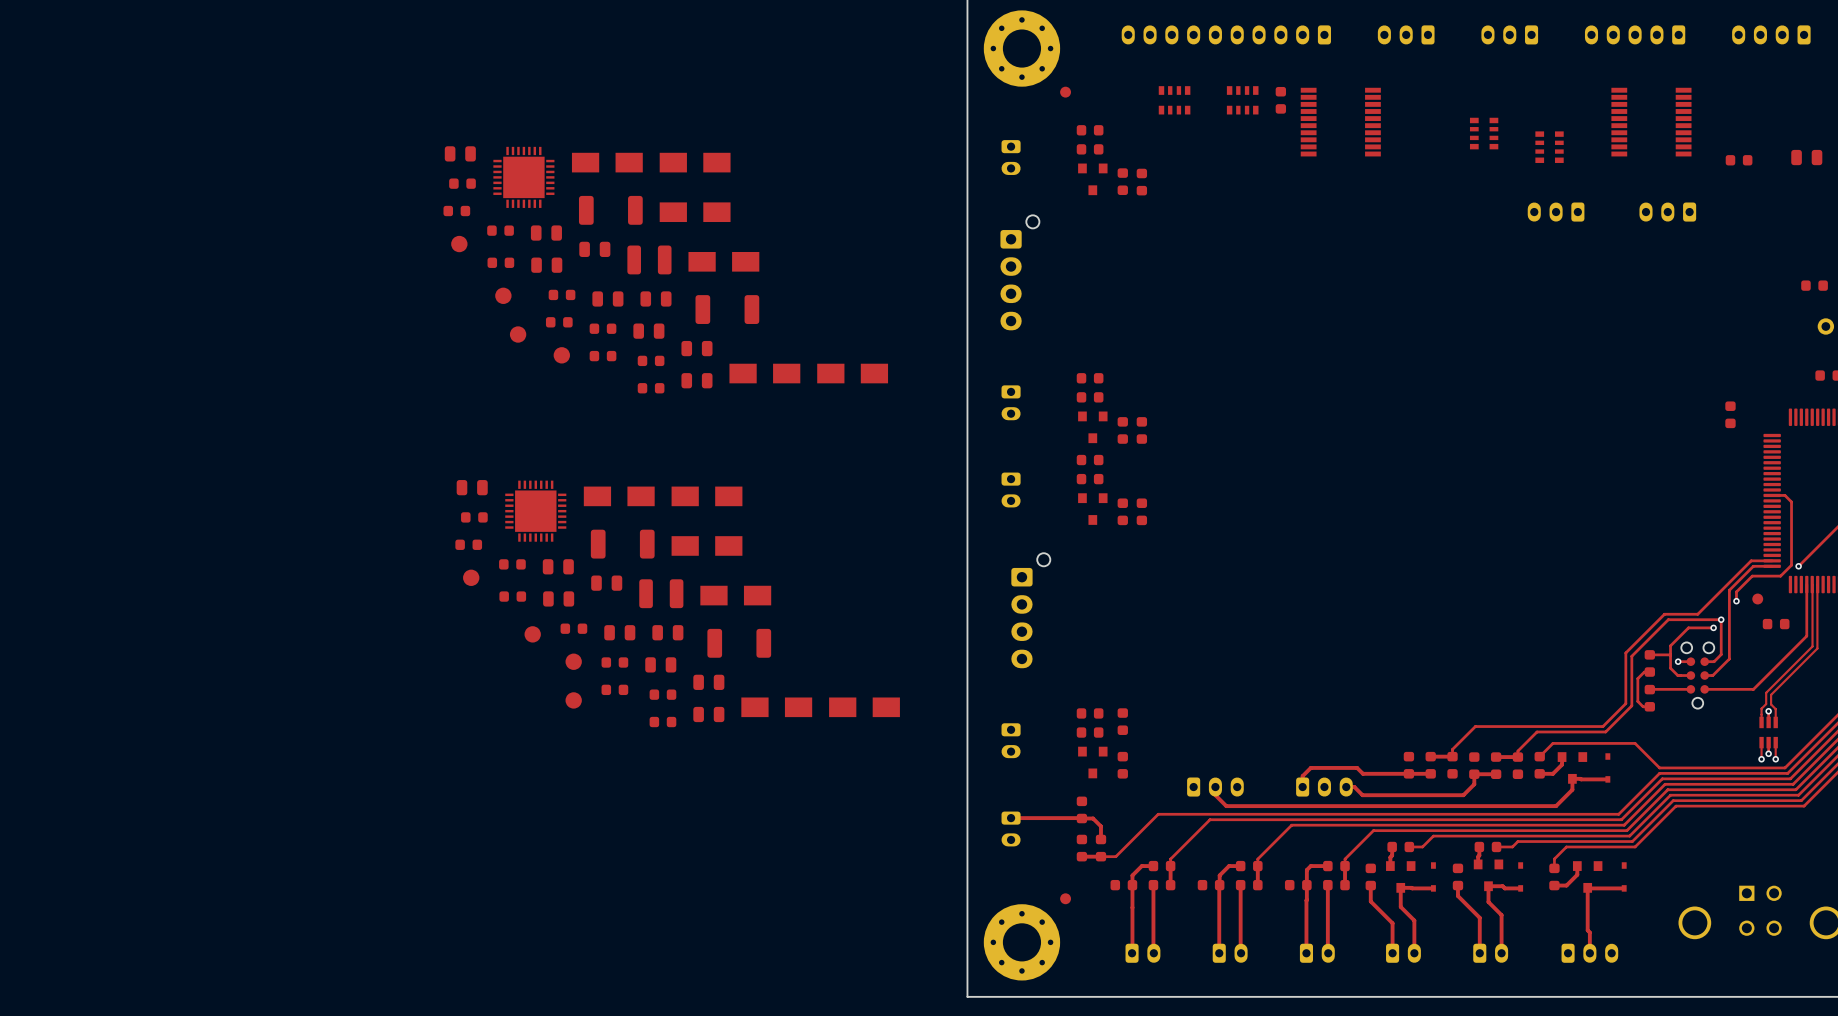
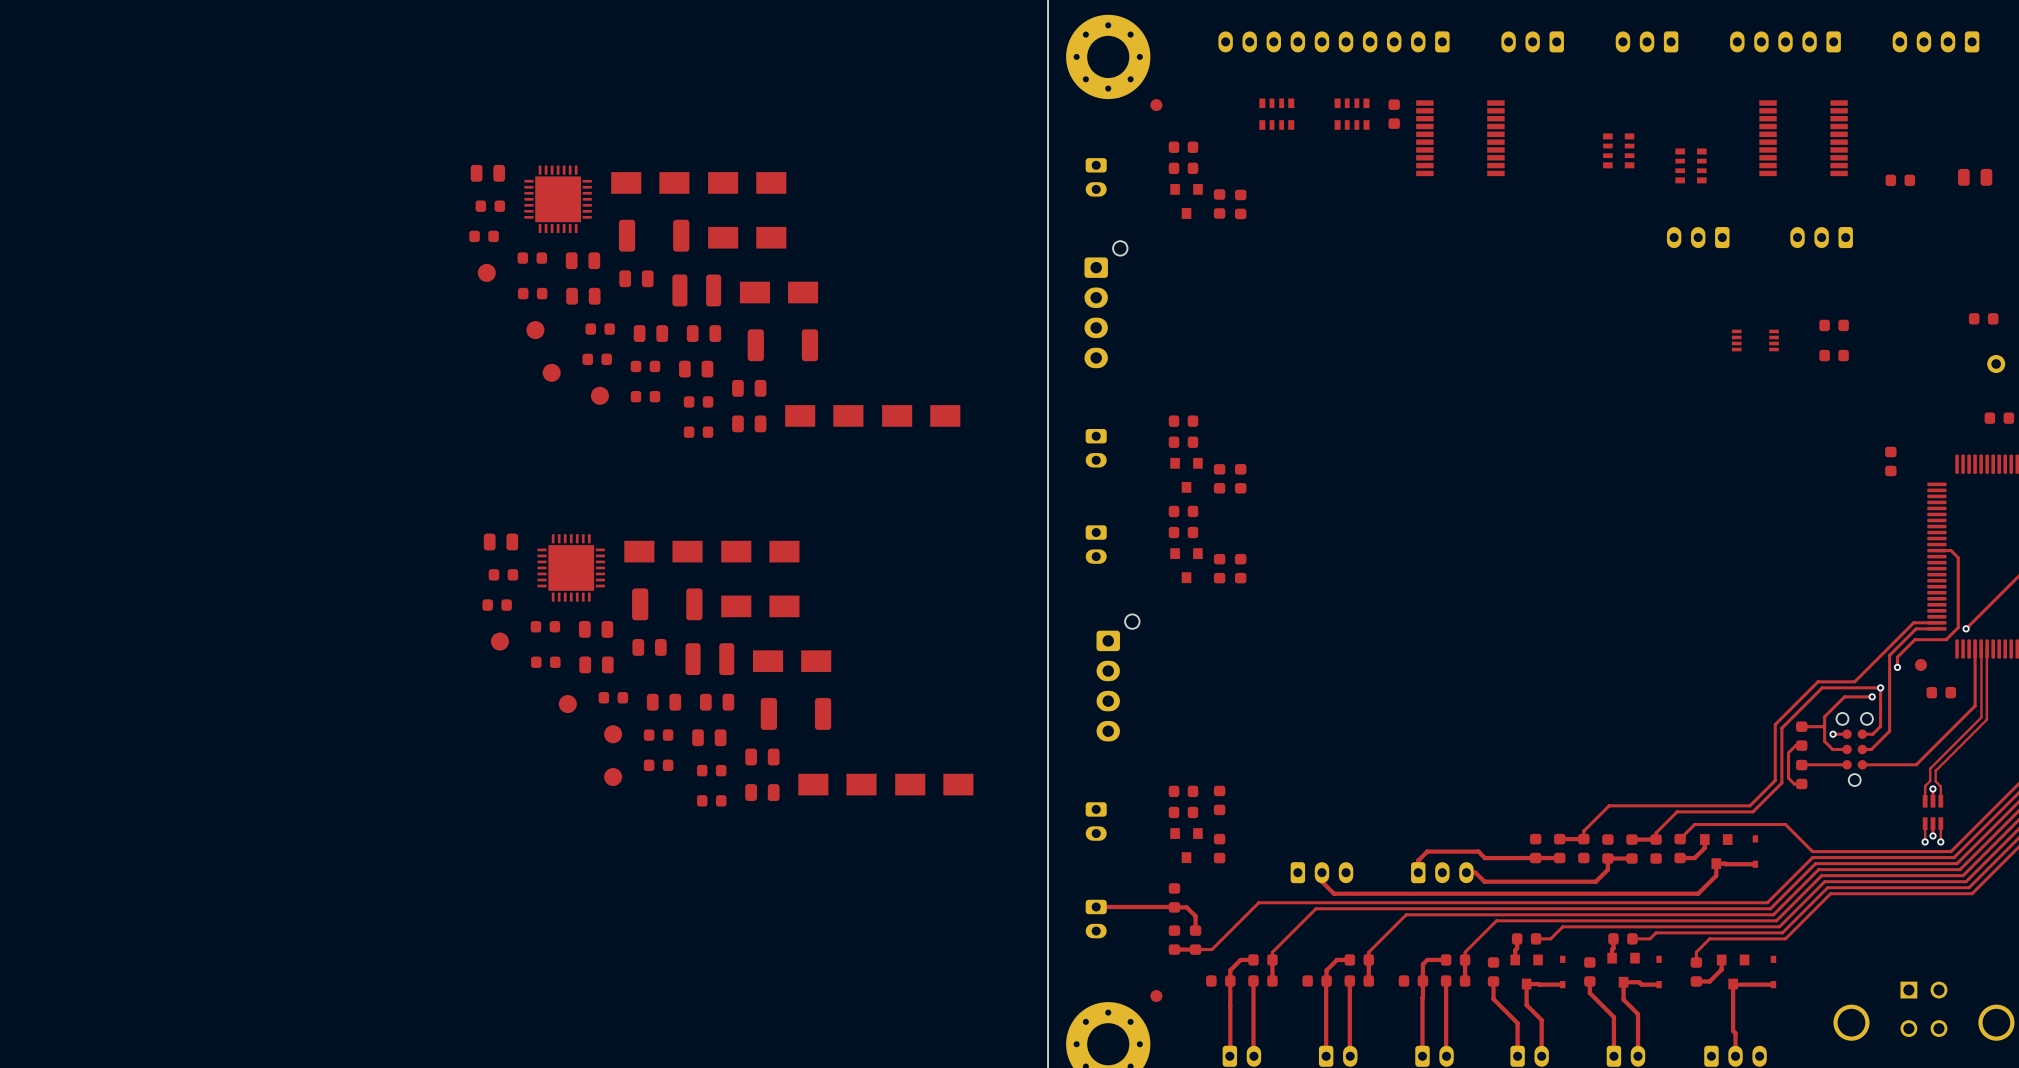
part: none -> (1834, 325)
part: none -> (1755, 340)
part: none -> (1834, 355)

